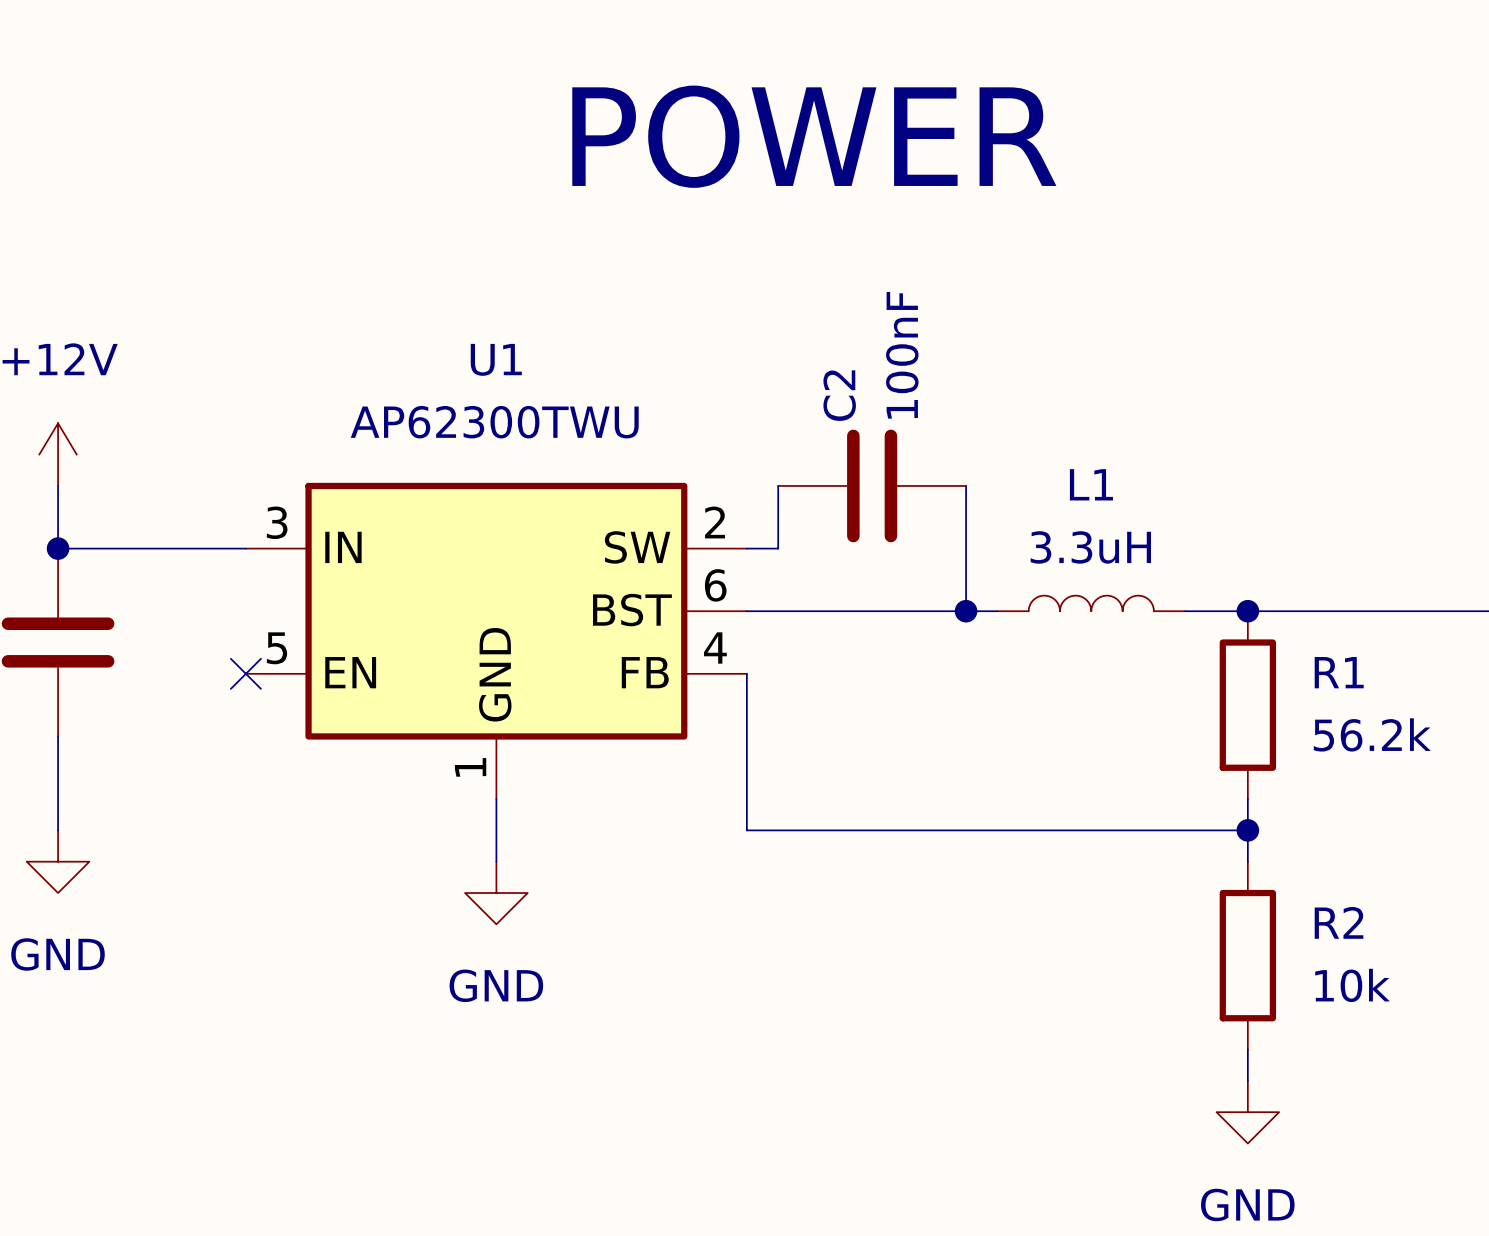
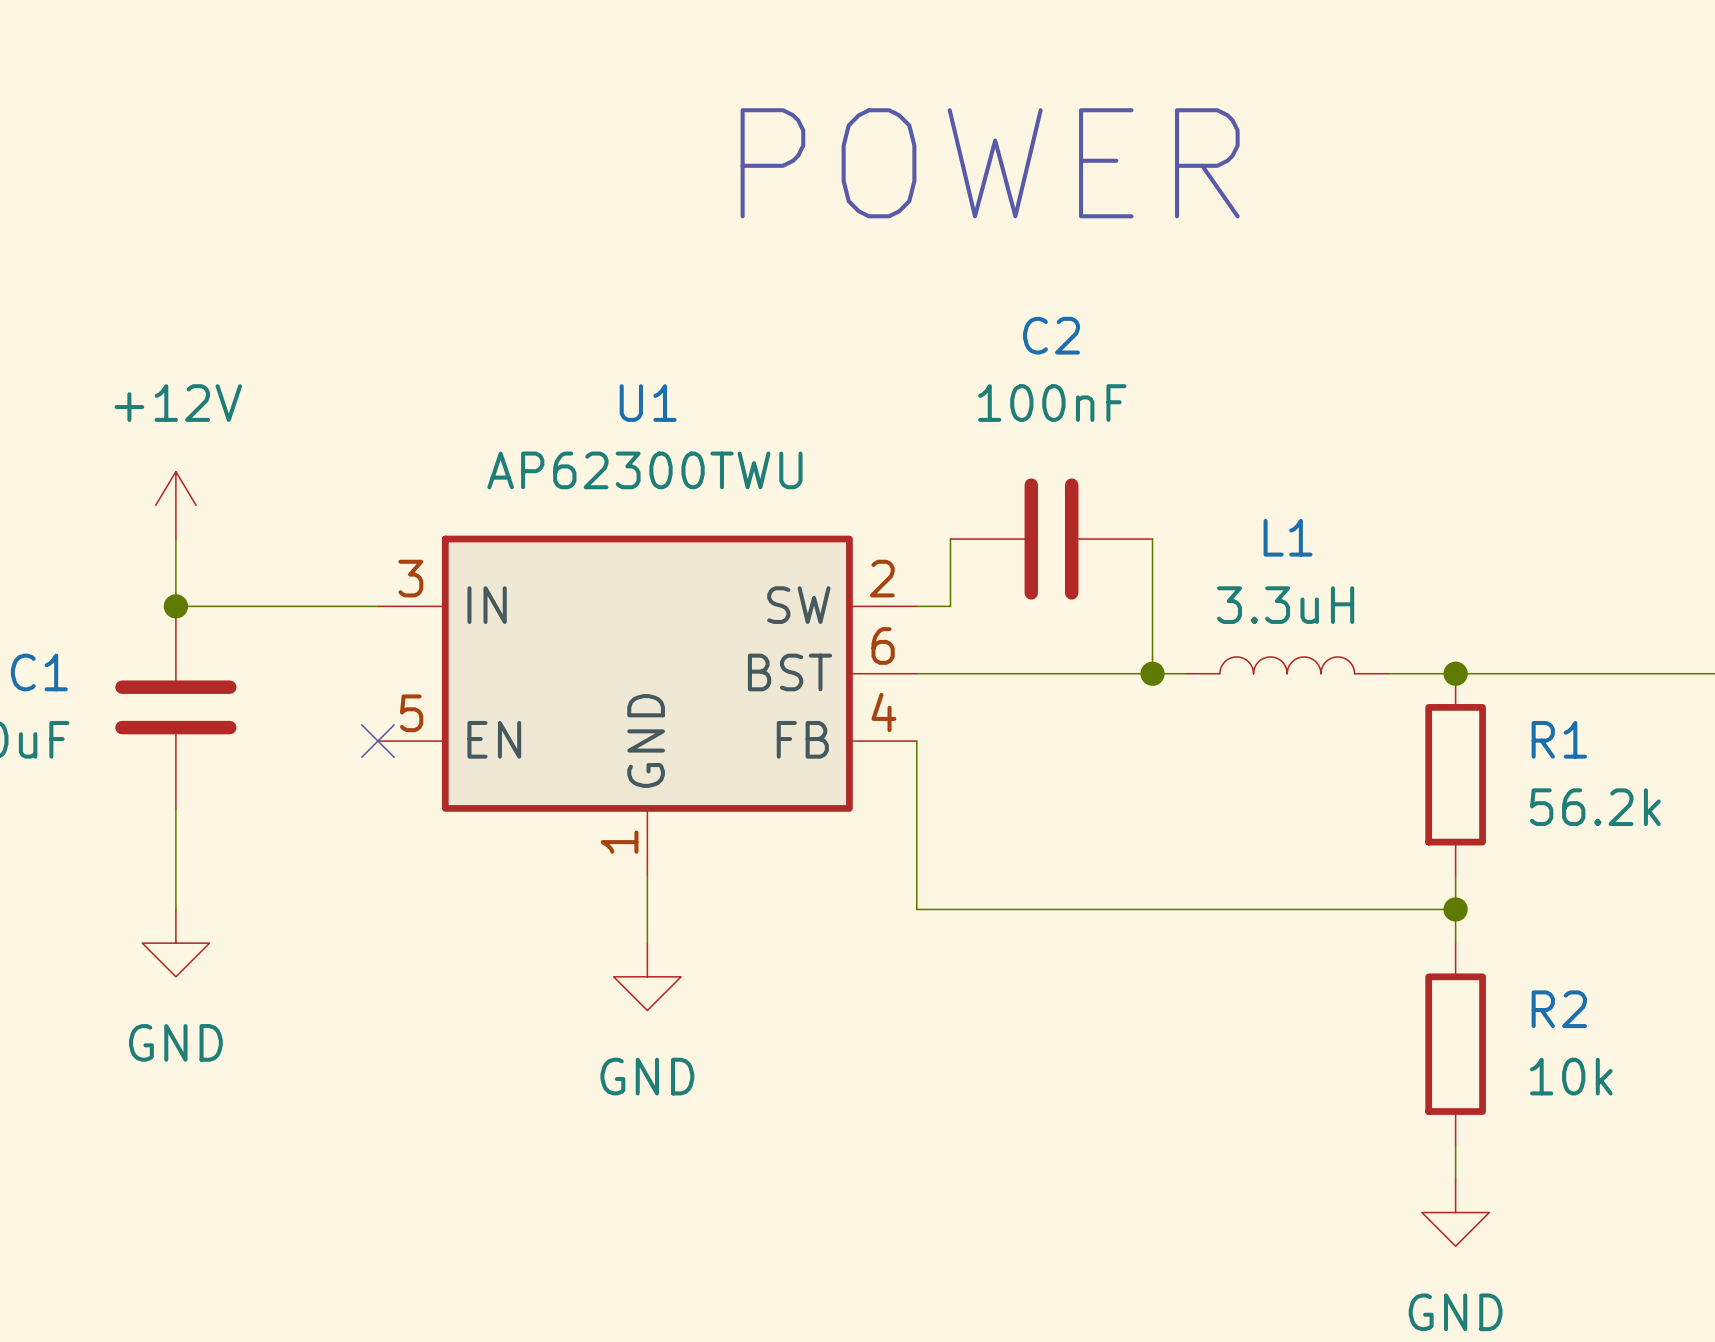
C2 value rotation: 0° (902, 355) -> 90° clockwise (1052, 403)
C2 name rotation: 0° (839, 395) -> 90° clockwise (1051, 335)
C2 name position: C2 (839, 395) -> C2 (1051, 335)

